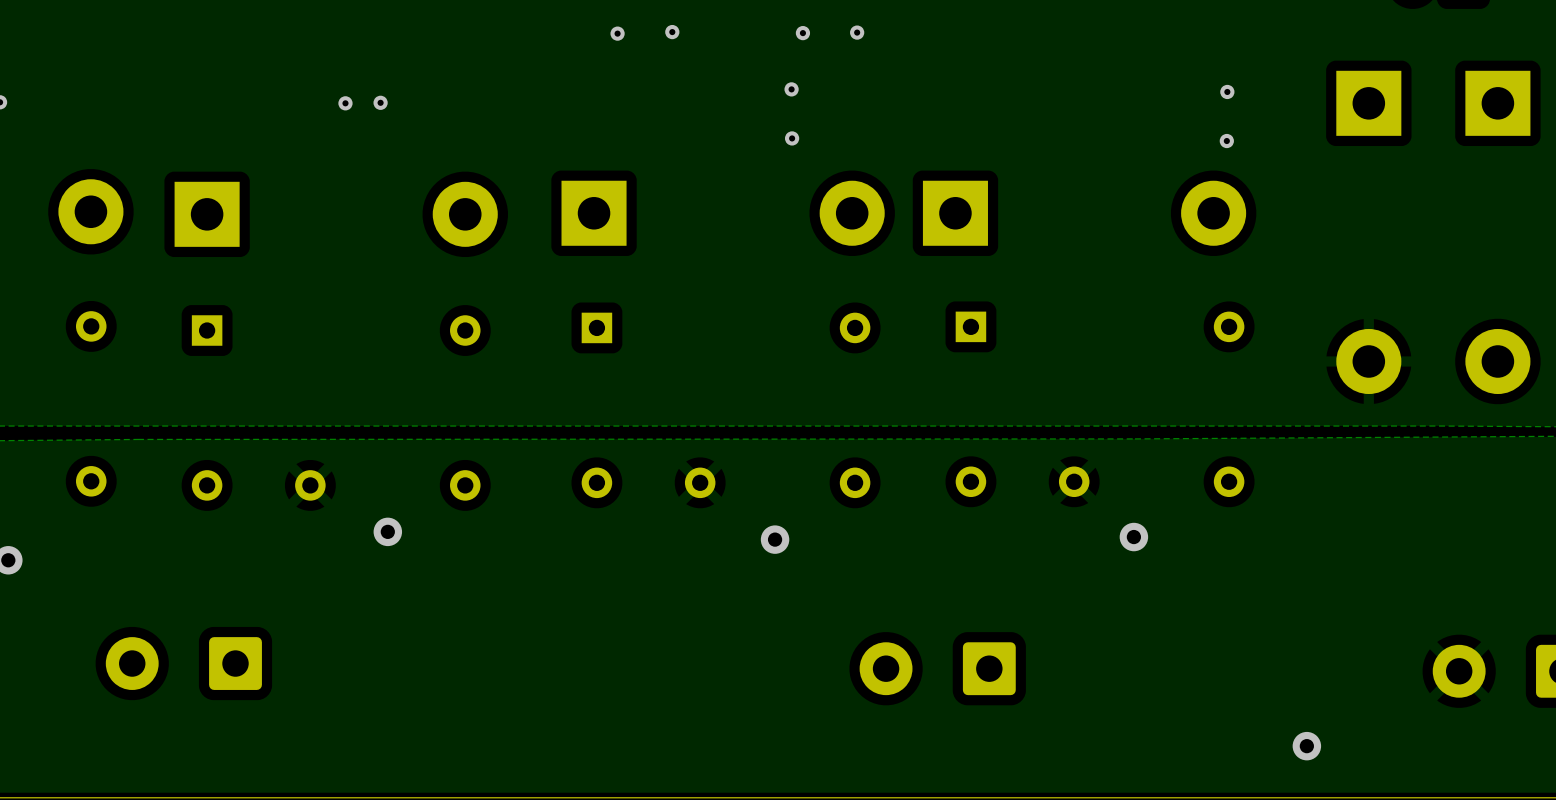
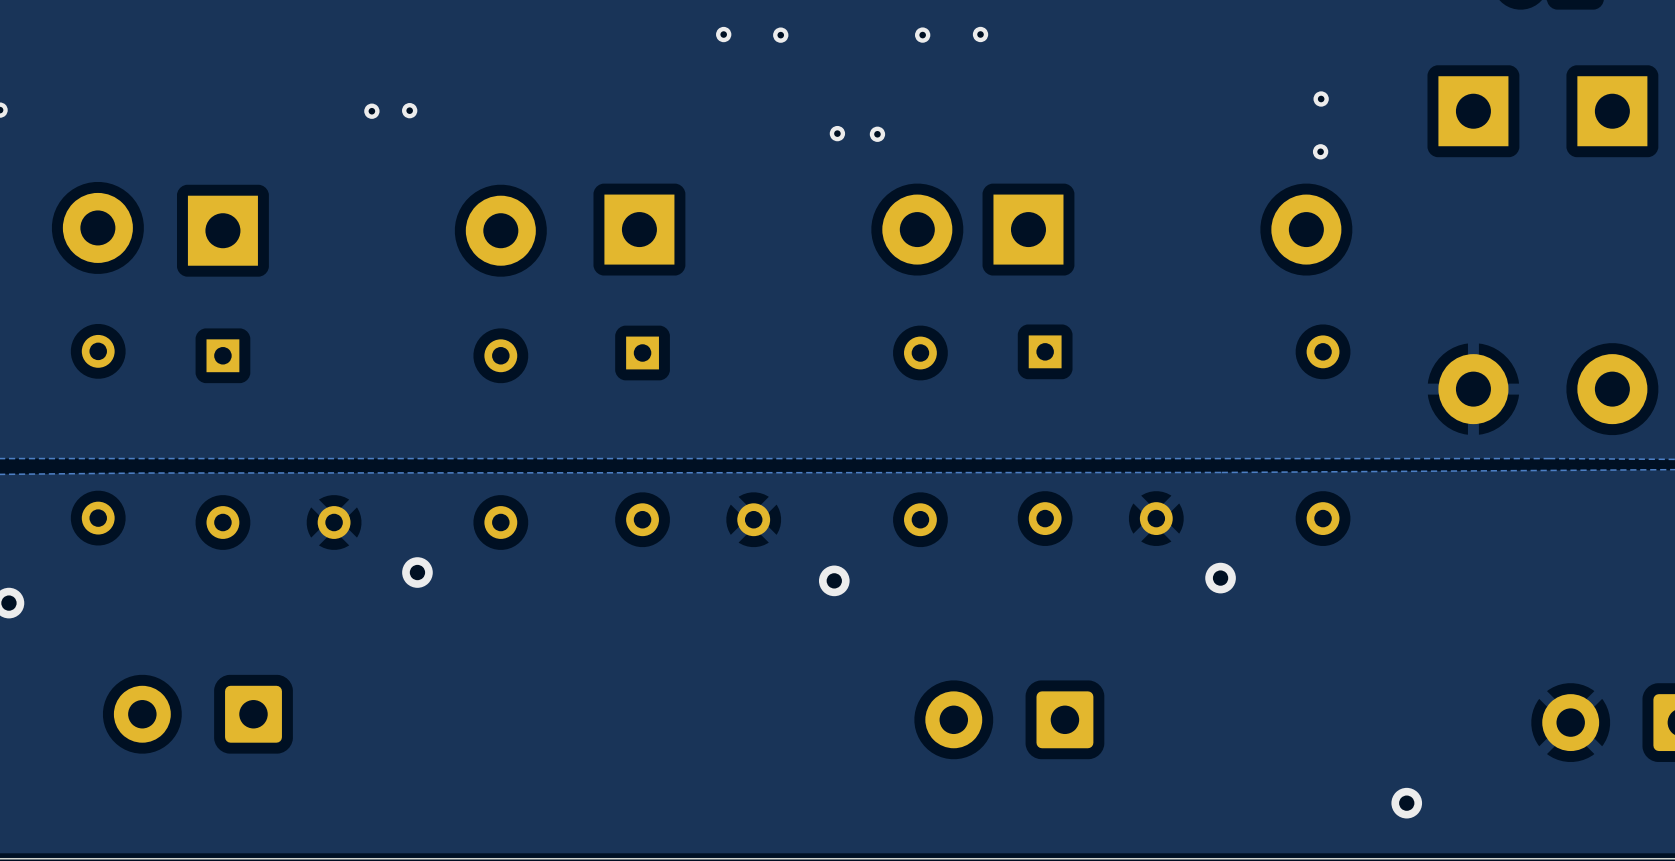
via: none -> (780, 35)
via: none -> (980, 34)
via: (617, 33) -> none
via: (802, 33) -> none
via: (791, 89) -> none
via: none -> (837, 133)
via: none -> (877, 134)
via: (792, 138) -> none

